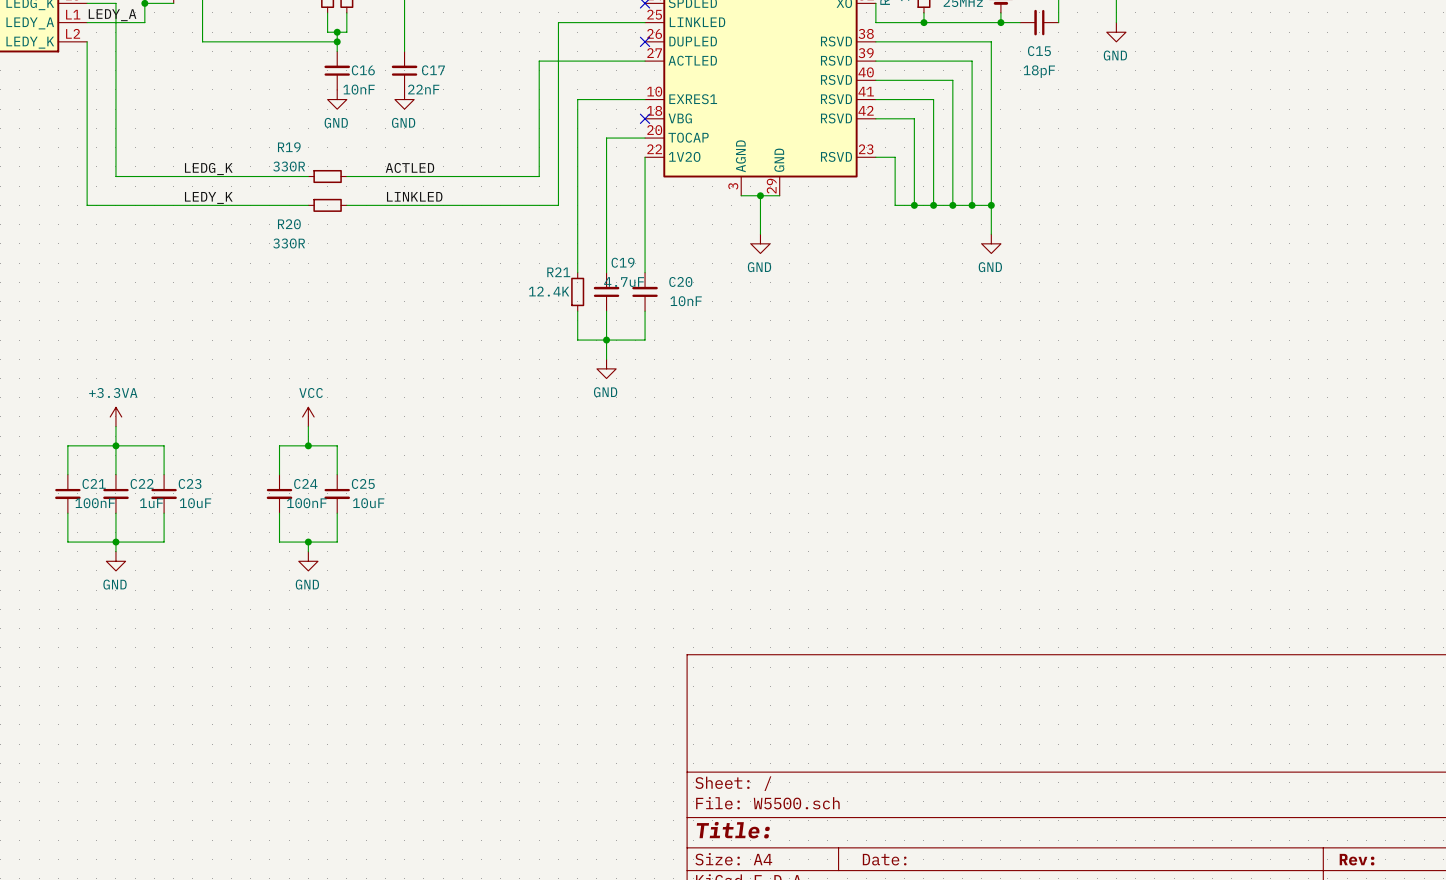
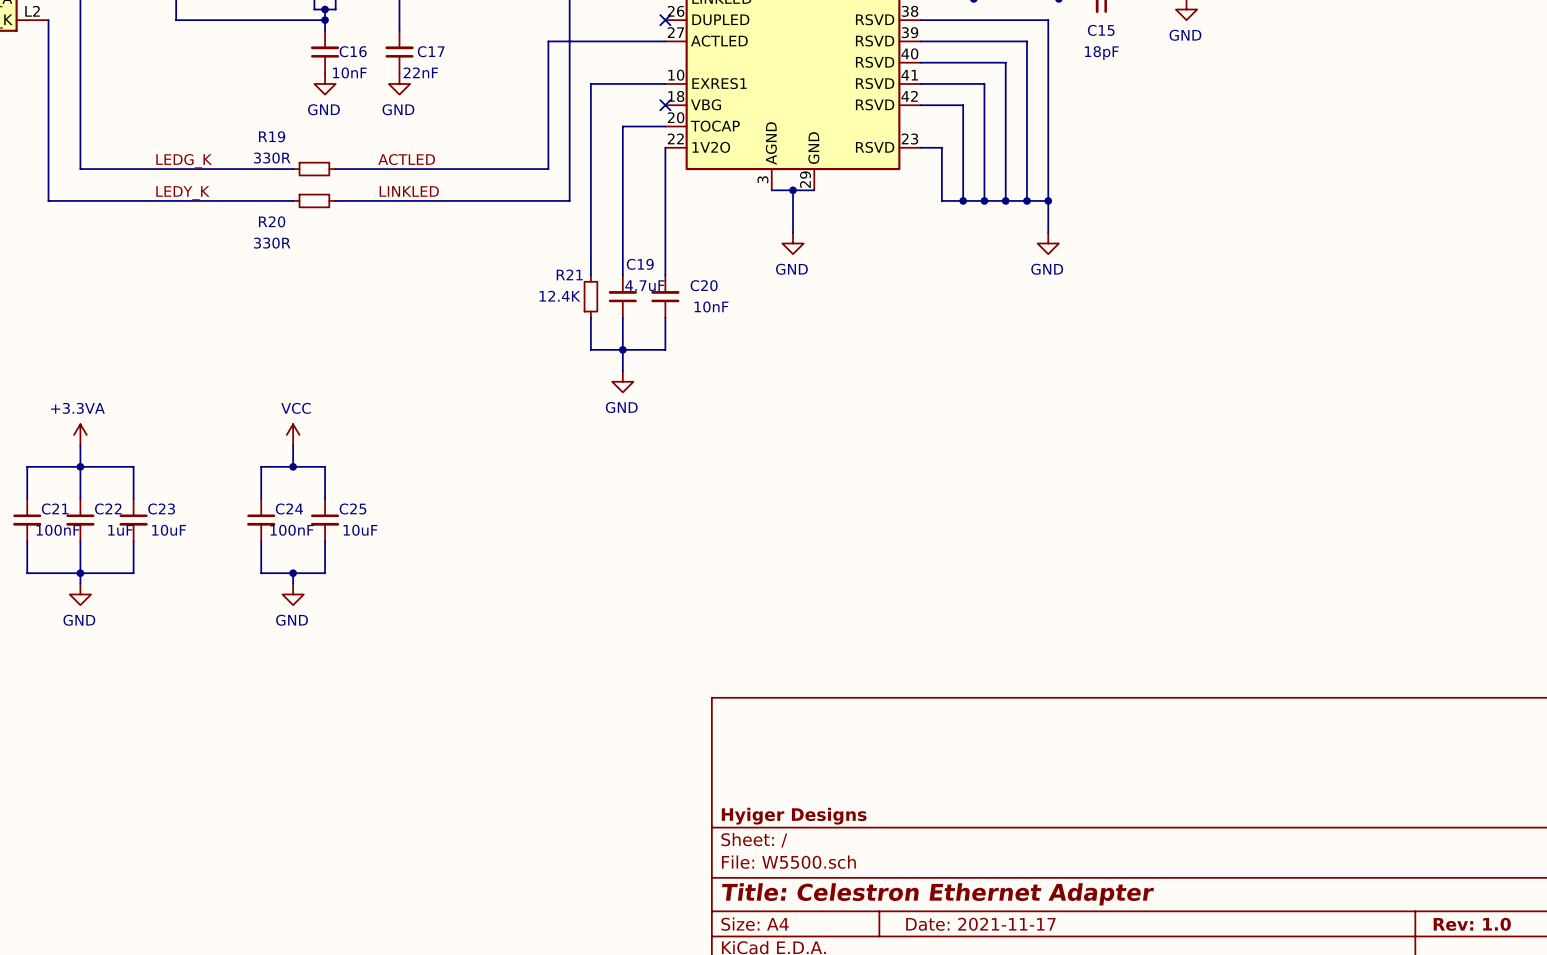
title block: none -> Hyiger Designs (794, 816)
title block: Title: (733, 830) -> Title: Celestron Ethernet Adapter (937, 894)
title block: Date: (884, 859) -> Date: 2021-11-17 (980, 924)
title block: Rev: (1357, 859) -> Rev: 1.0 (1472, 924)

